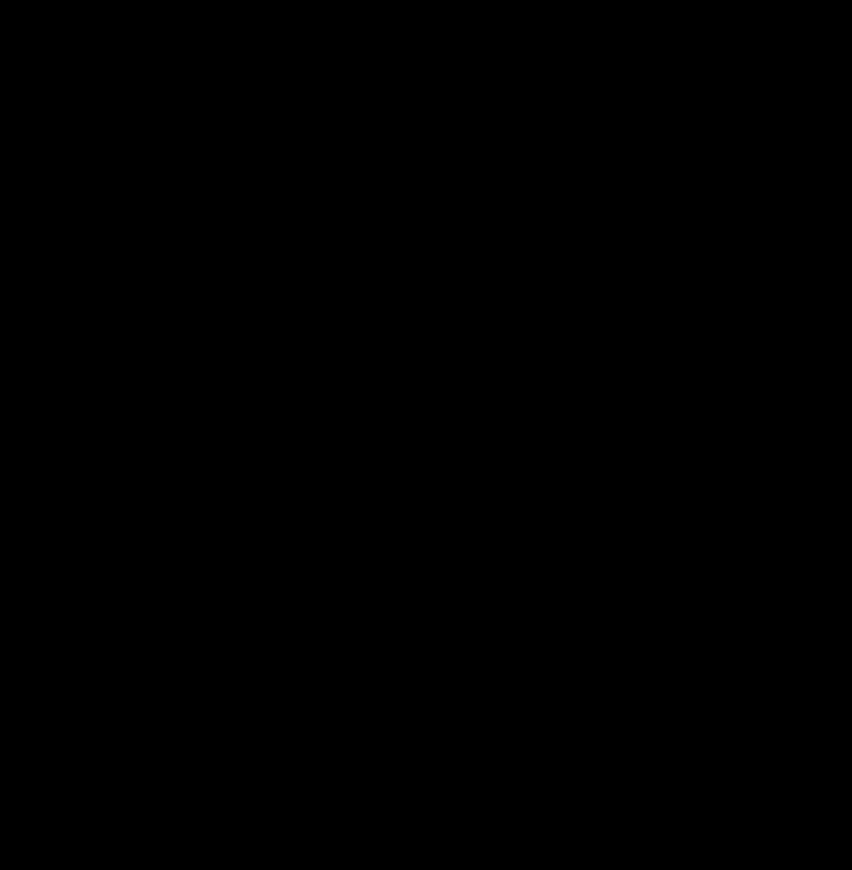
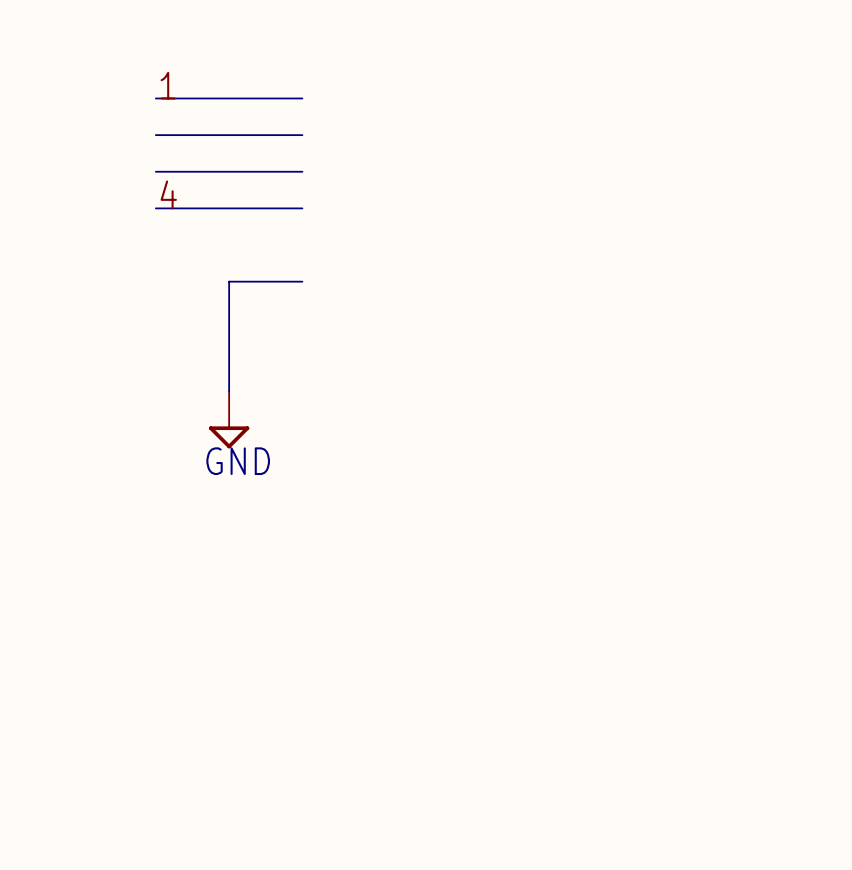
label: none -> 1 (168, 85)
wire: none -> (155, 98) (302, 98)
wire: none -> (155, 135) (302, 135)
wire: none -> (155, 171) (302, 171)
label: none -> 4 (168, 194)
wire: none -> (155, 208) (302, 208)
wire: none -> (302, 281) (229, 281) (229, 391)
power symbol: none -> GND (229, 419)

